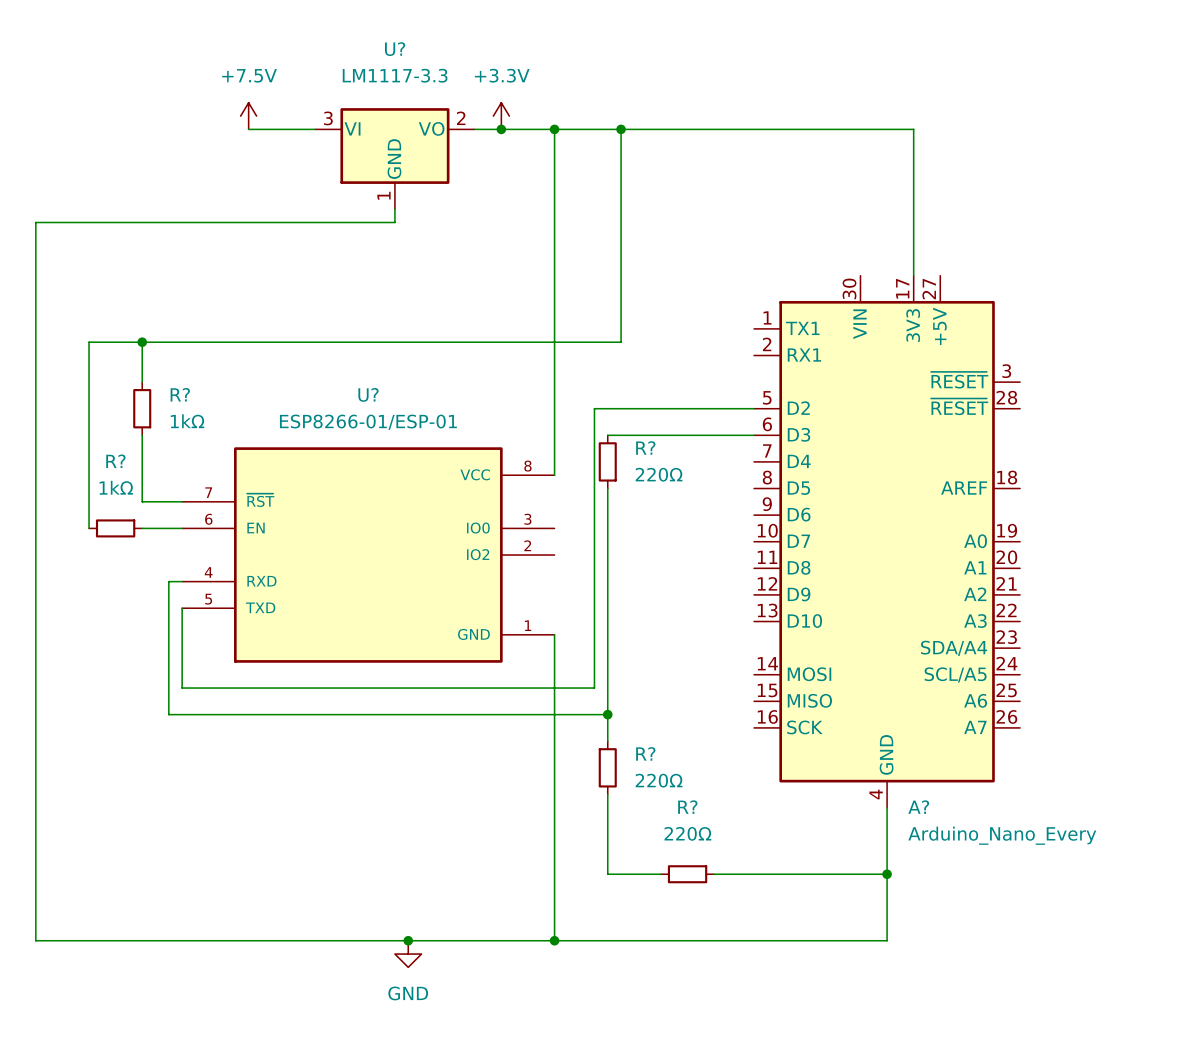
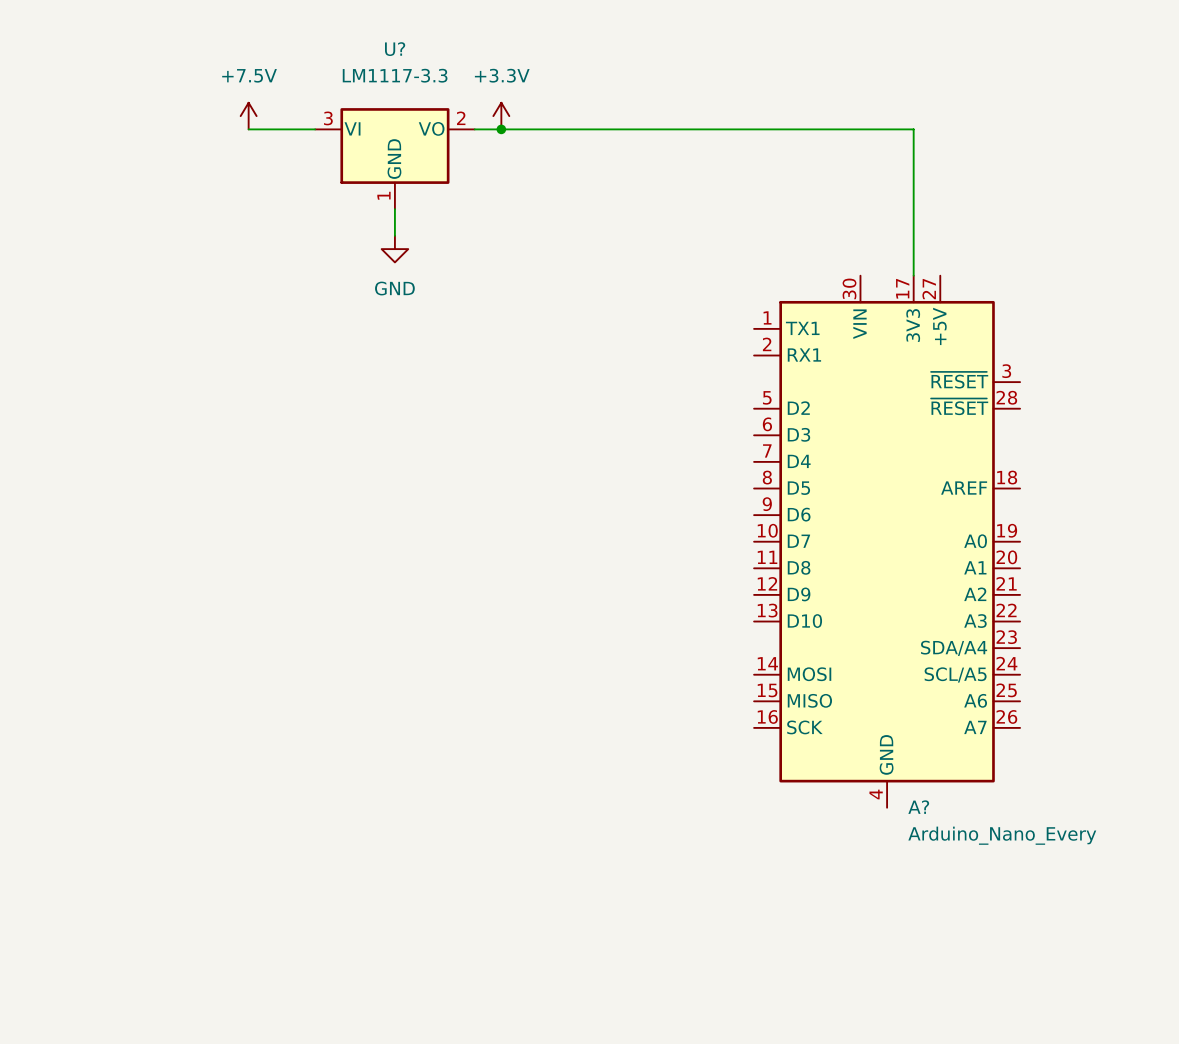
wire: (554, 129) (554, 475) -> none
junction: (554, 129) -> none
wire: (621, 129) (621, 342) (89, 342) (89, 528) -> none
junction: (621, 129) -> none
wire: (394, 222) (35, 222) (35, 940) (887, 940) (887, 807) -> (394, 222) (394, 235)
power symbol: none -> GND (394, 249)
wire: (142, 342) (142, 382) -> none
junction: (142, 342) -> none
R?: 1kΩ (142, 408) -> none
wire: (754, 408) (594, 408) (594, 688) (182, 688) (182, 608) -> none
wire: (142, 435) (142, 501) (182, 501) -> none
wire: (607, 435) (754, 435) -> none
R?: 220Ω (607, 461) -> none
wire: (607, 488) (607, 741) -> none
R?: 1kΩ (115, 528) -> none
wire: (142, 528) (182, 528) -> none
U?: ESP8266-01/ESP-01 (368, 555) -> none
wire: (182, 581) (168, 581) (168, 714) (607, 714) -> none
wire: (554, 634) (554, 940) -> none
junction: (607, 714) -> none
R?: 220Ω (607, 767) -> none
wire: (607, 794) (607, 874) (660, 874) -> none
R?: 220Ω (687, 874) -> none
wire: (714, 874) (887, 874) -> none
junction: (887, 874) -> none
junction: (408, 940) -> none
junction: (554, 940) -> none
power symbol: GND (408, 954) -> none

